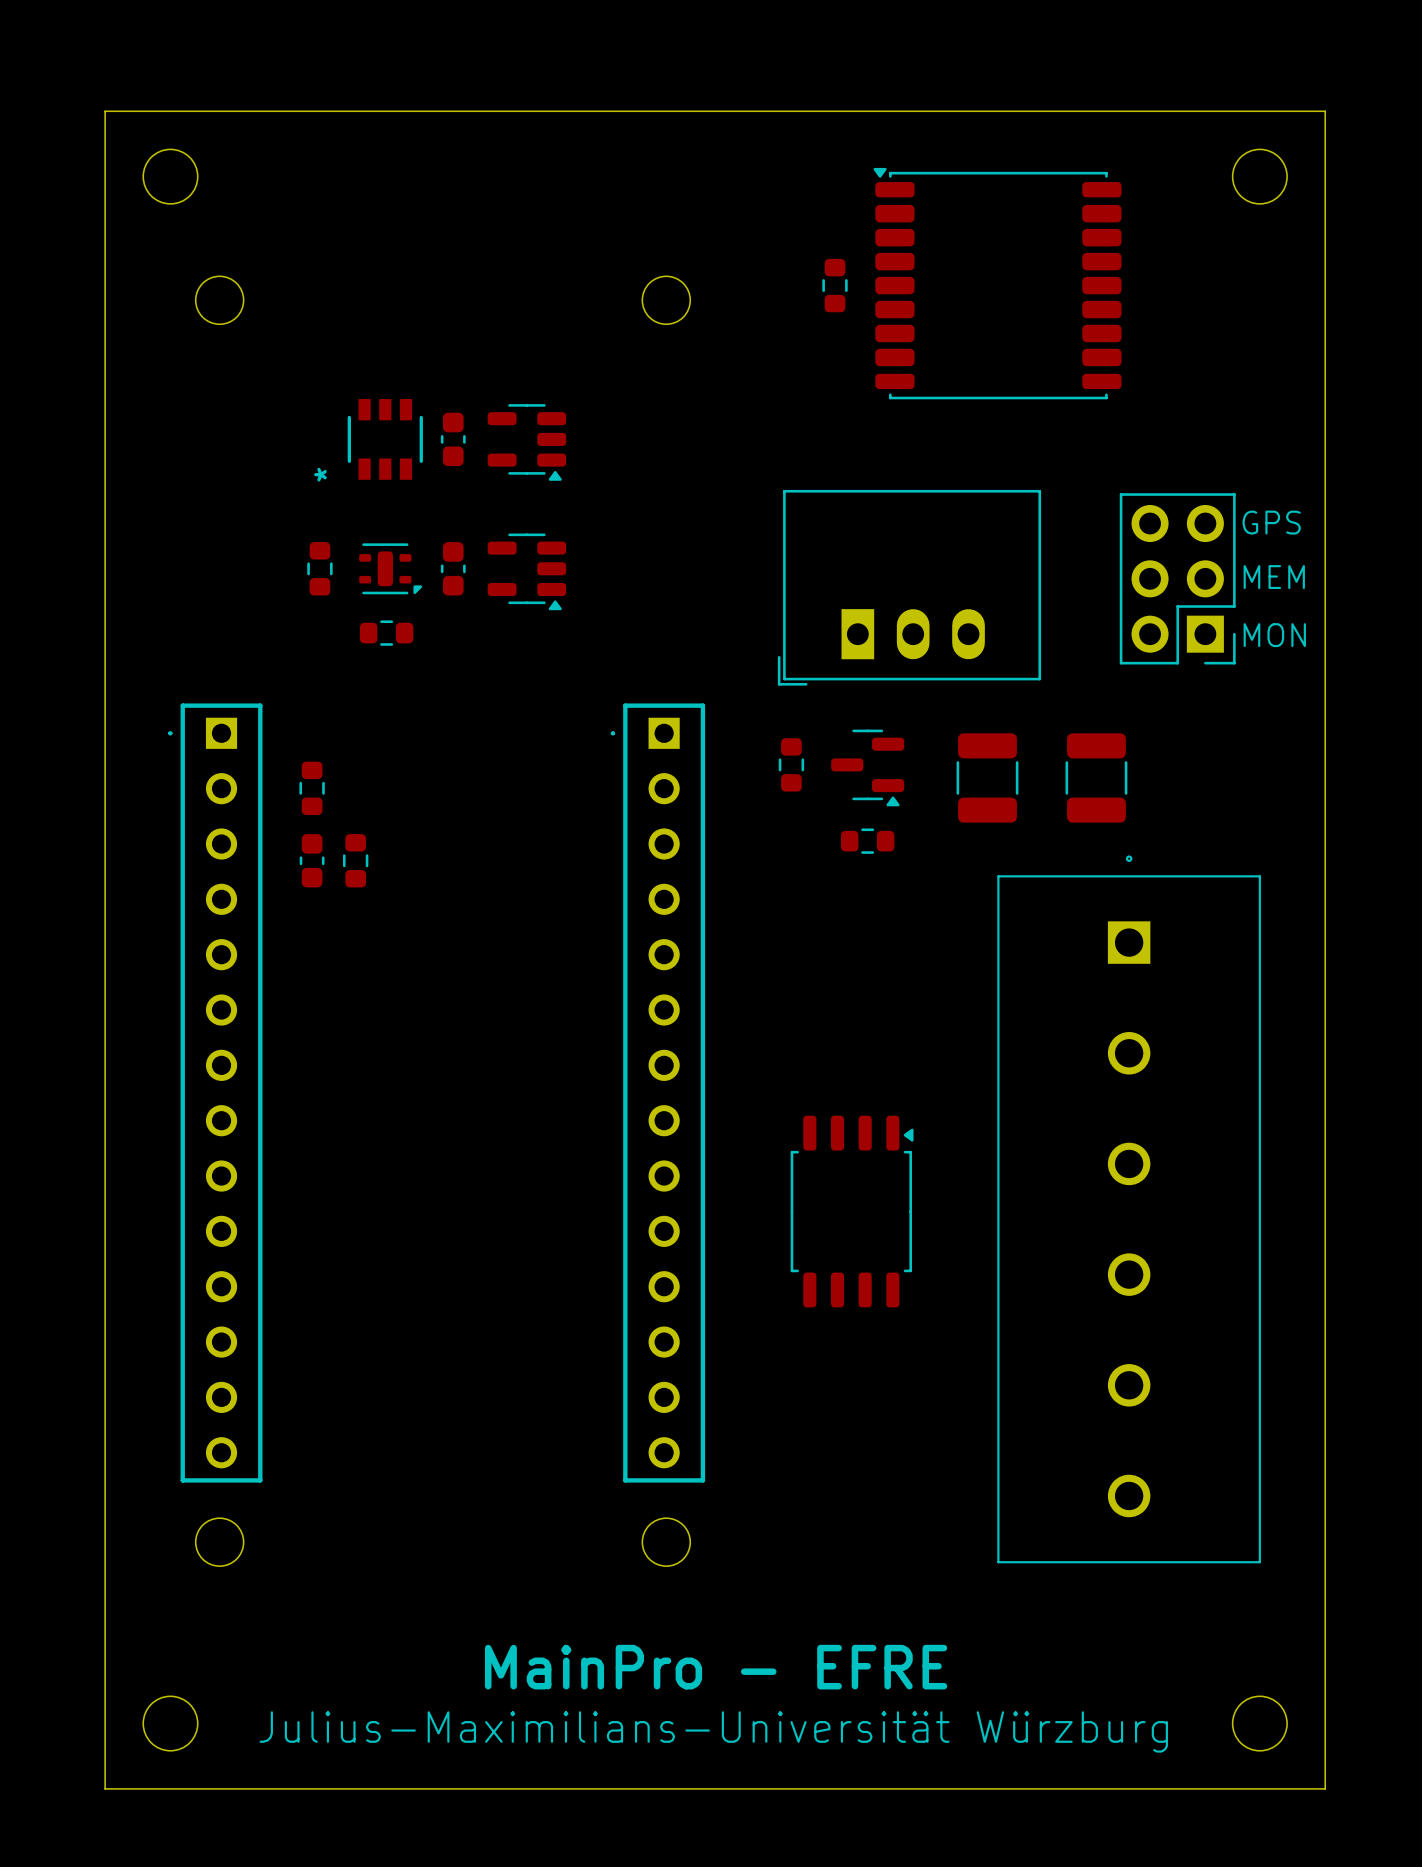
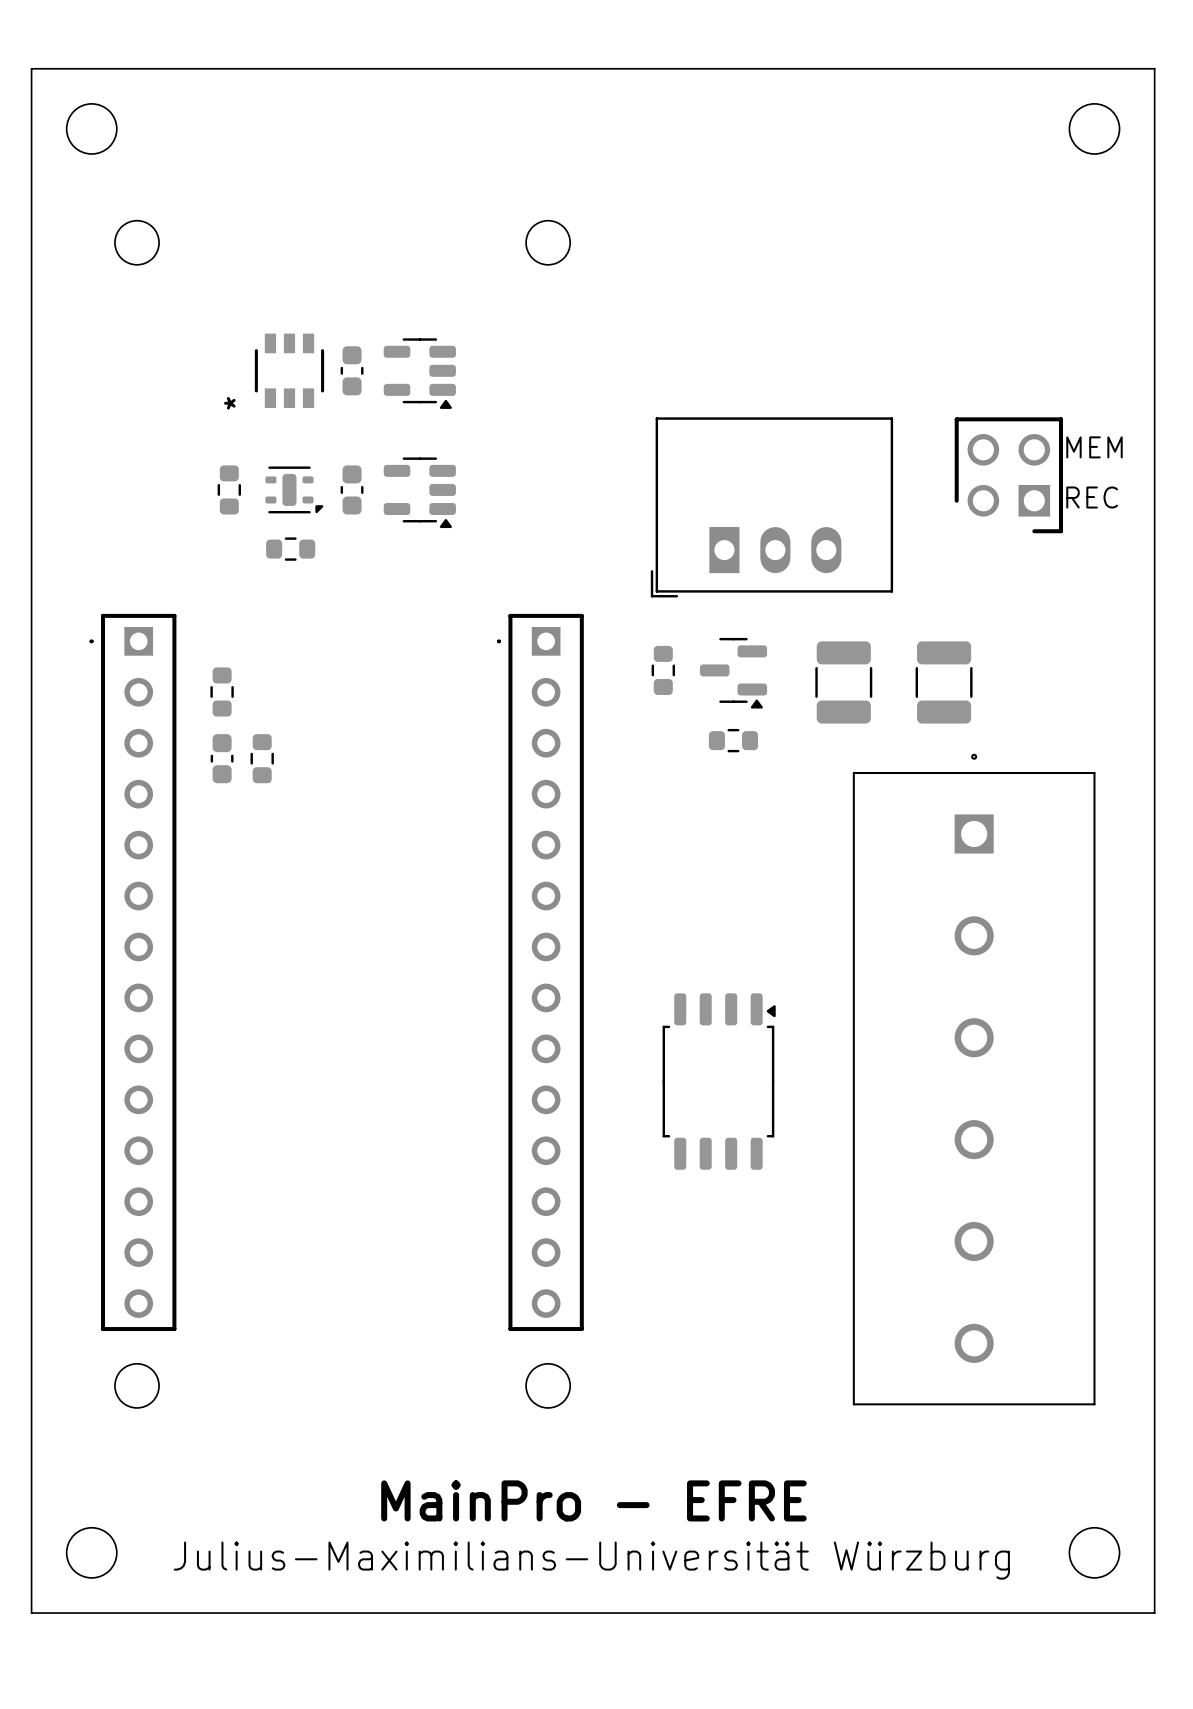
part: (997, 283) -> none
part: (835, 285) -> none
text: GPS (1271, 522) -> MEM (1094, 447)
part: none -> (1008, 475)
text: MEM (1274, 577) -> REC (1092, 497)
part: (1177, 578) -> none
text: MON (1274, 635) -> none

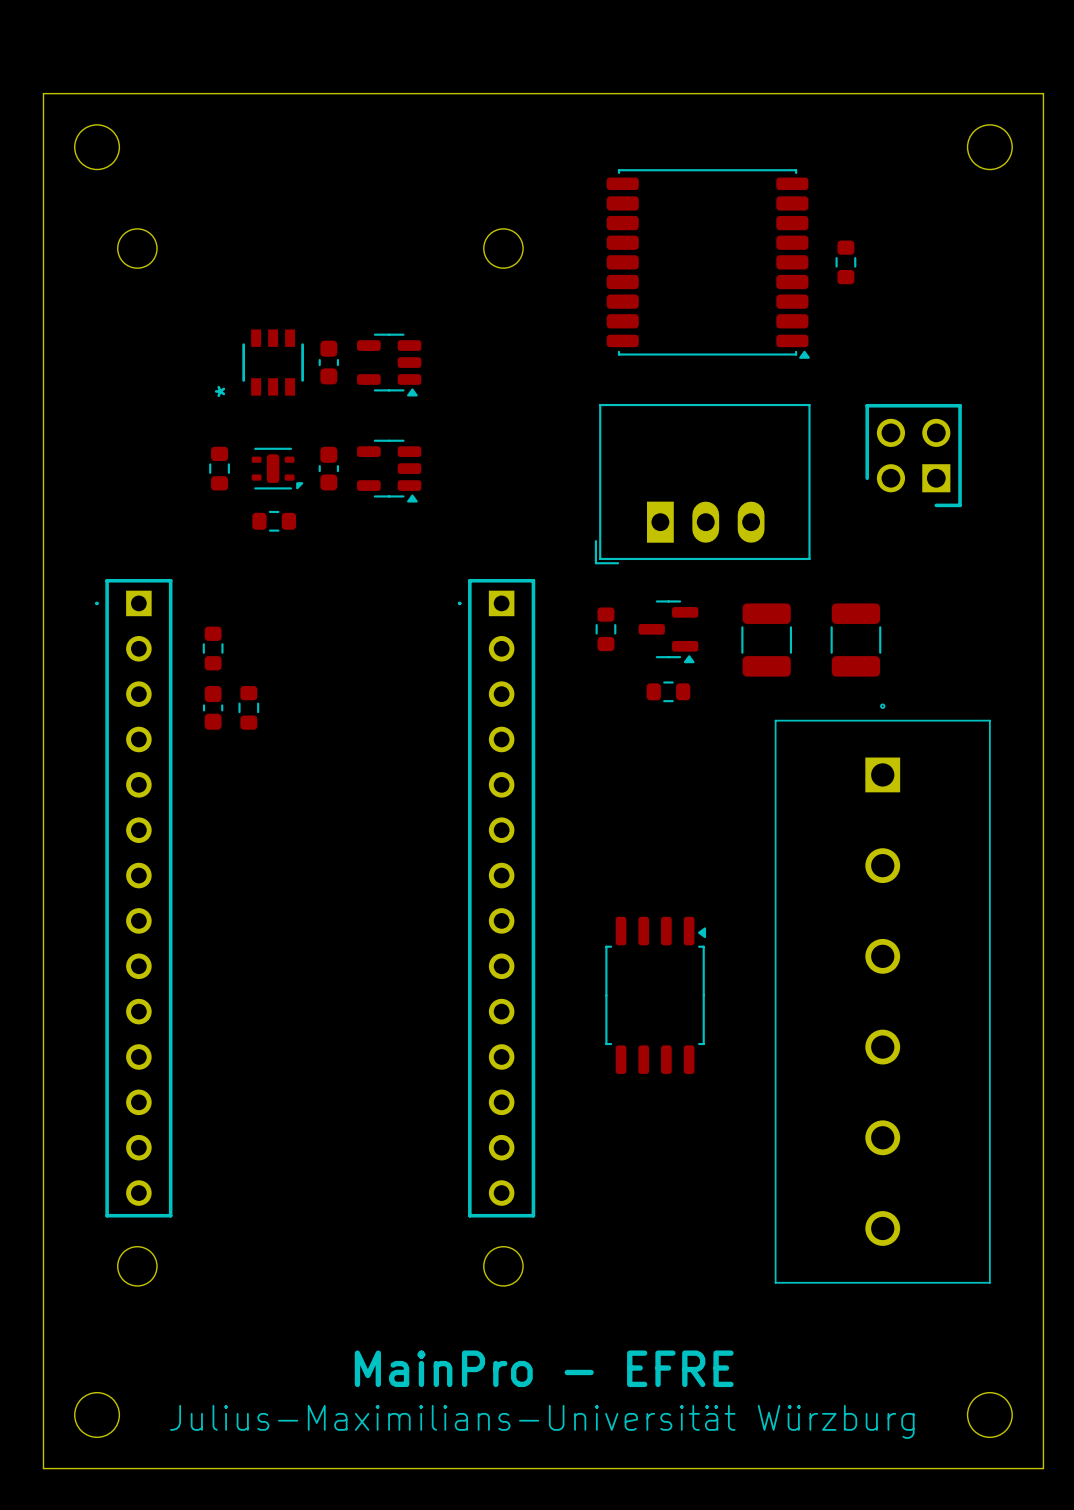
part: none -> (845, 262)
part: none -> (708, 263)
text: MEM (1094, 447) -> none
text: REC (1092, 497) -> none

